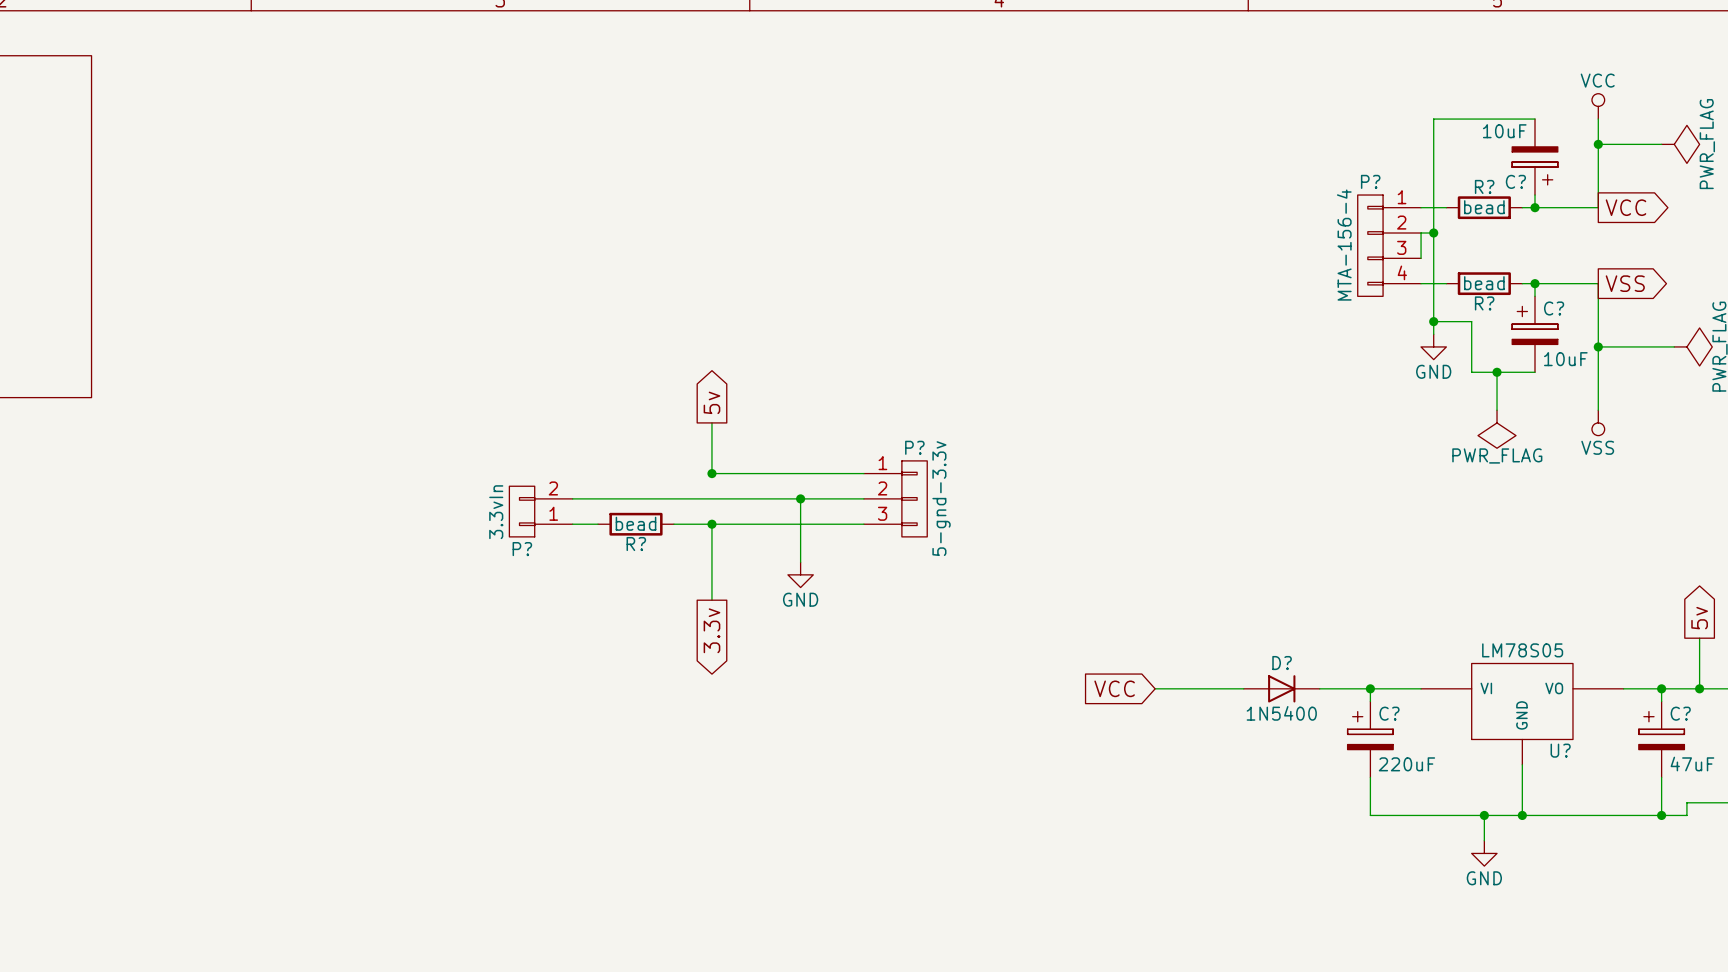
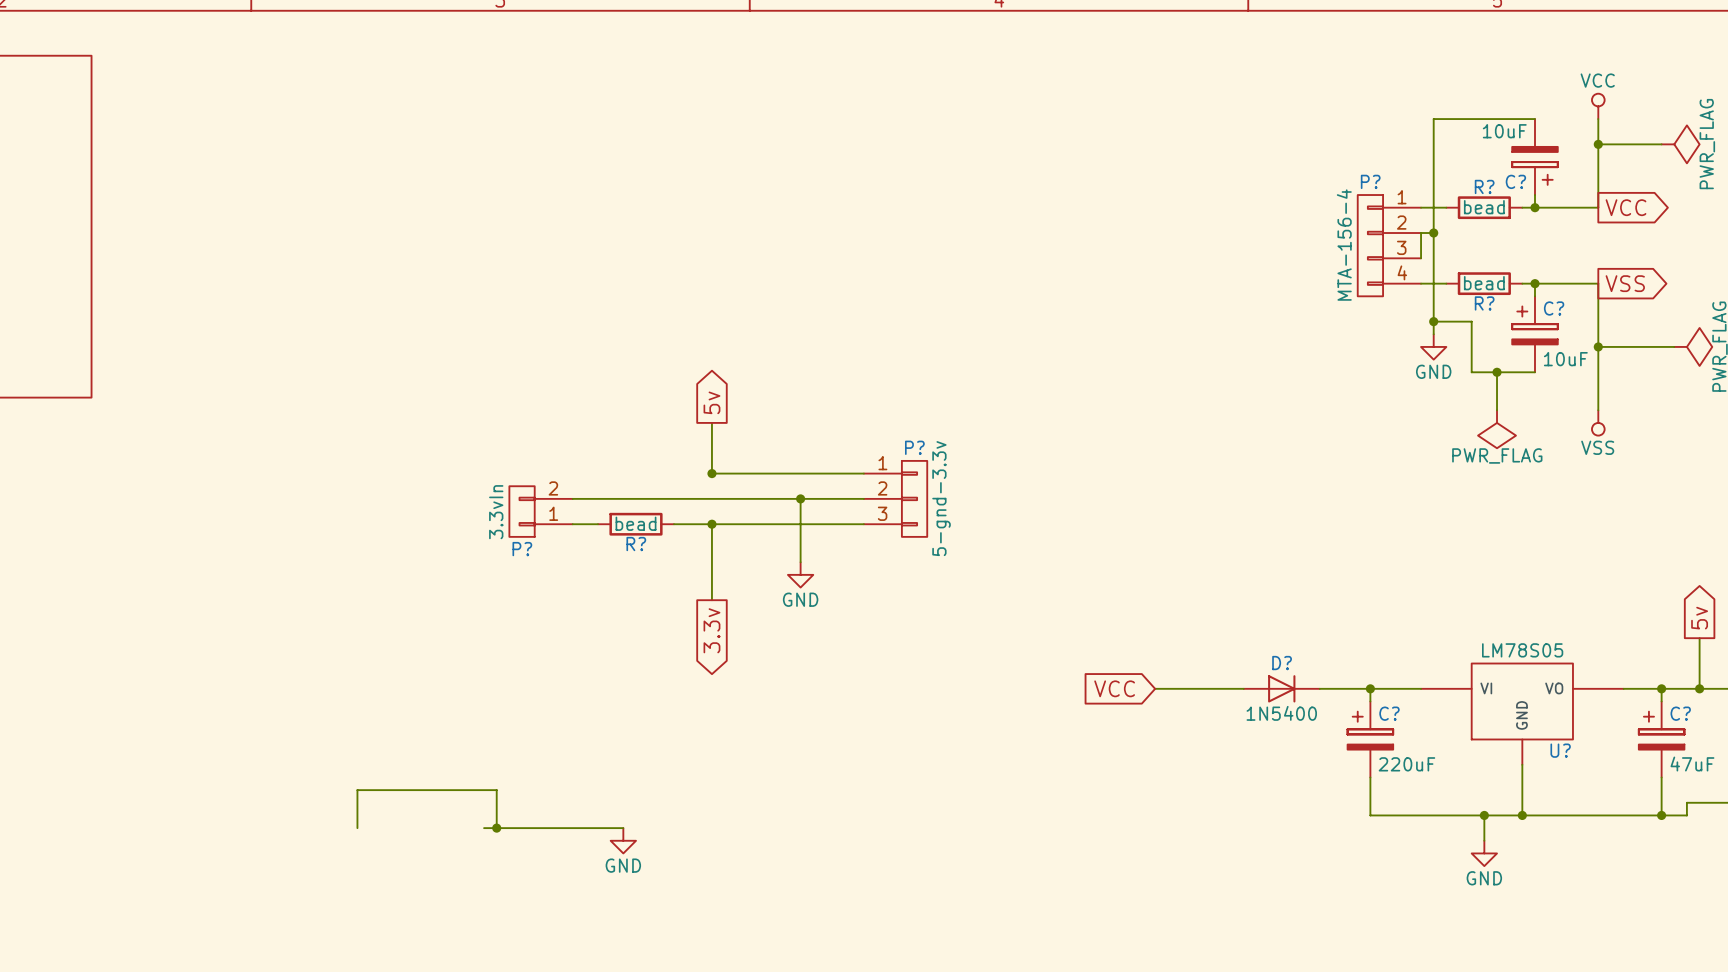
wire: none -> (357, 828) (357, 790) (496, 790) (496, 828)
wire: none -> (484, 828) (623, 828)
junction: none -> (496, 828)
power symbol: none -> GND (623, 840)

